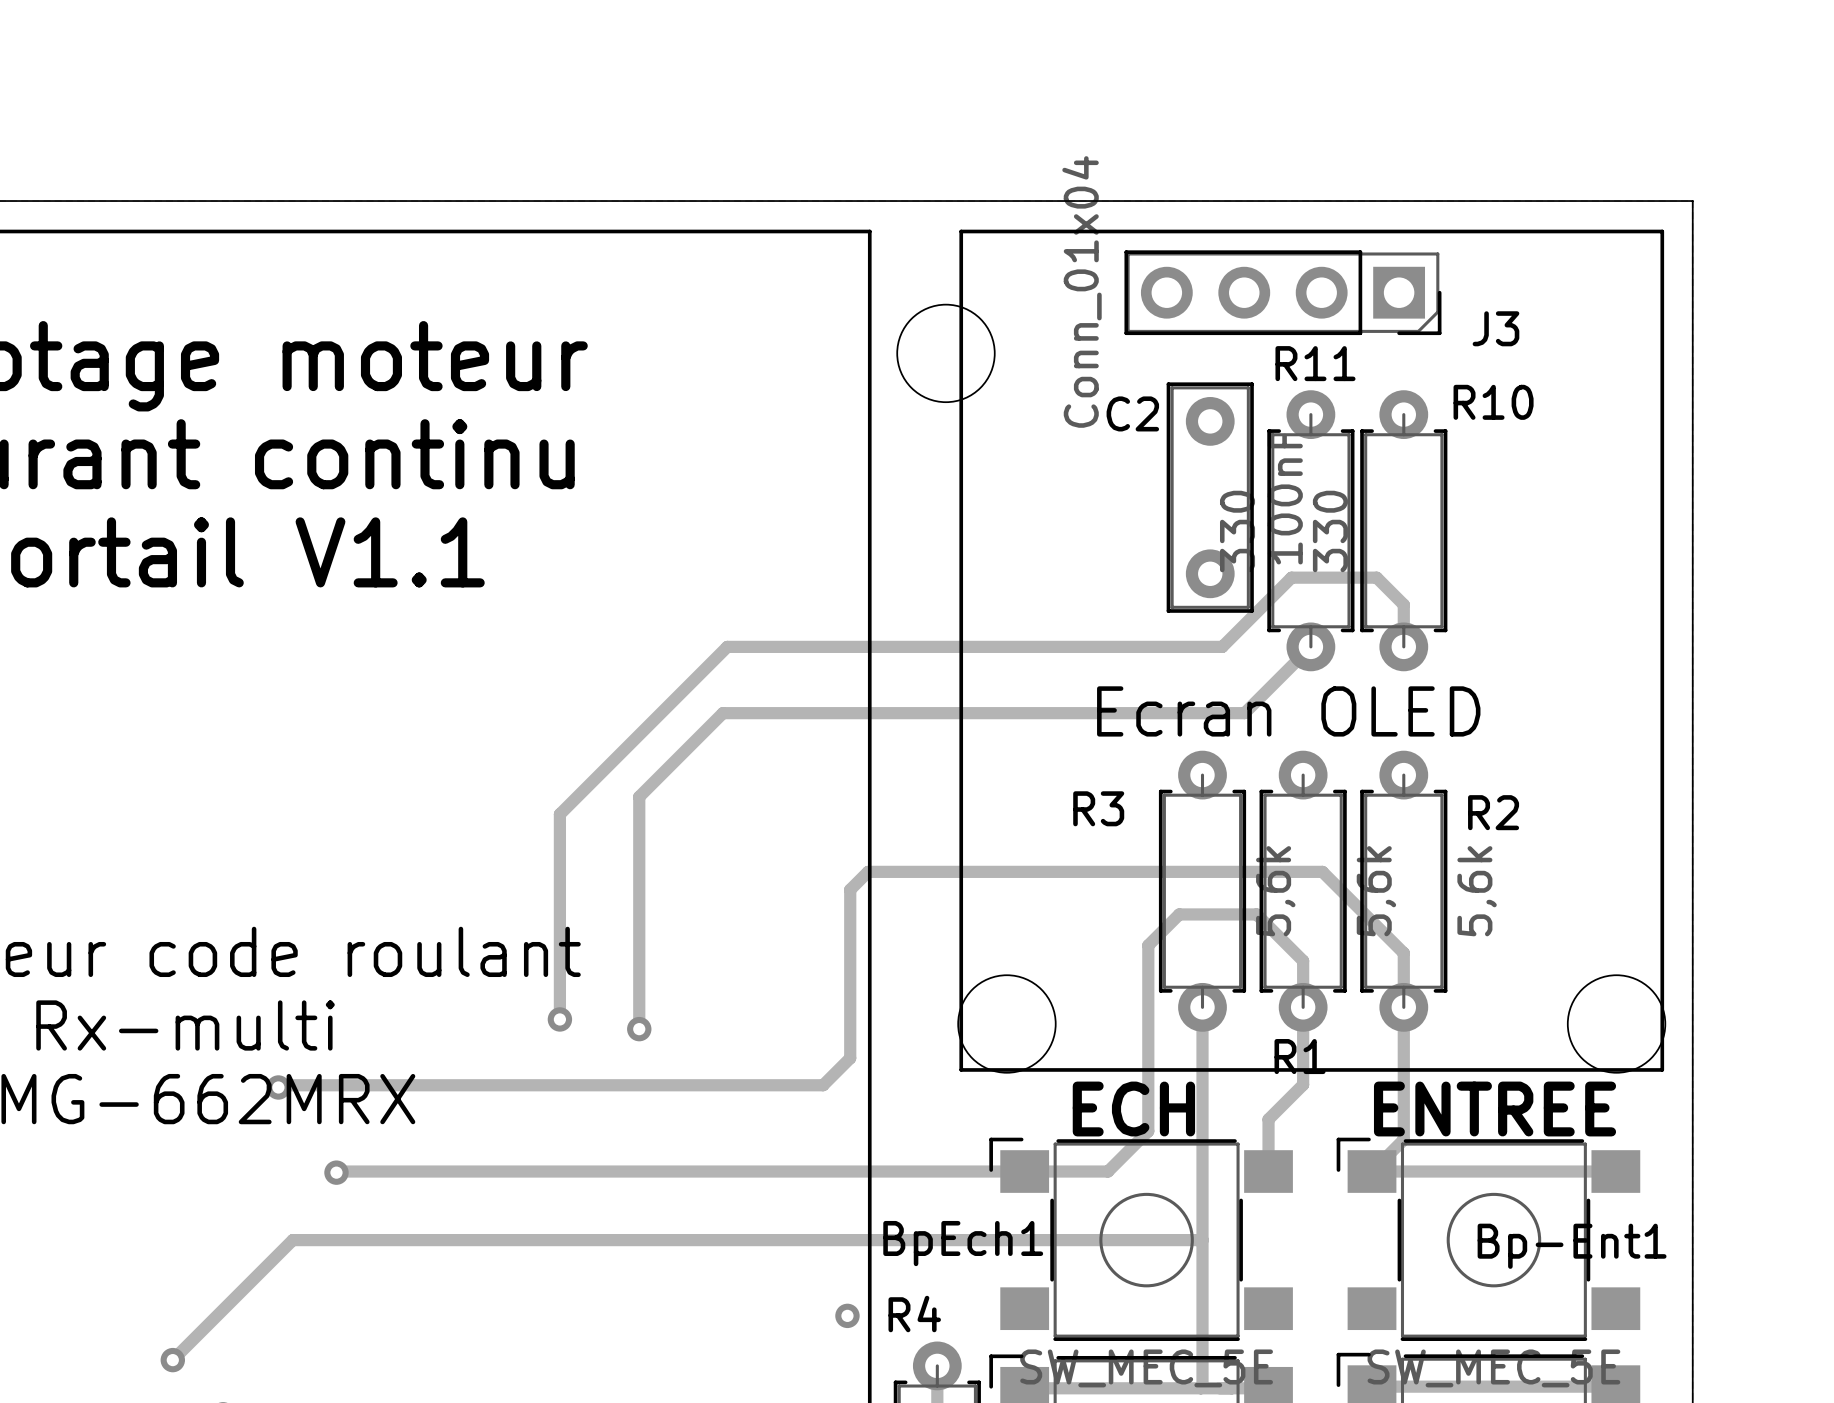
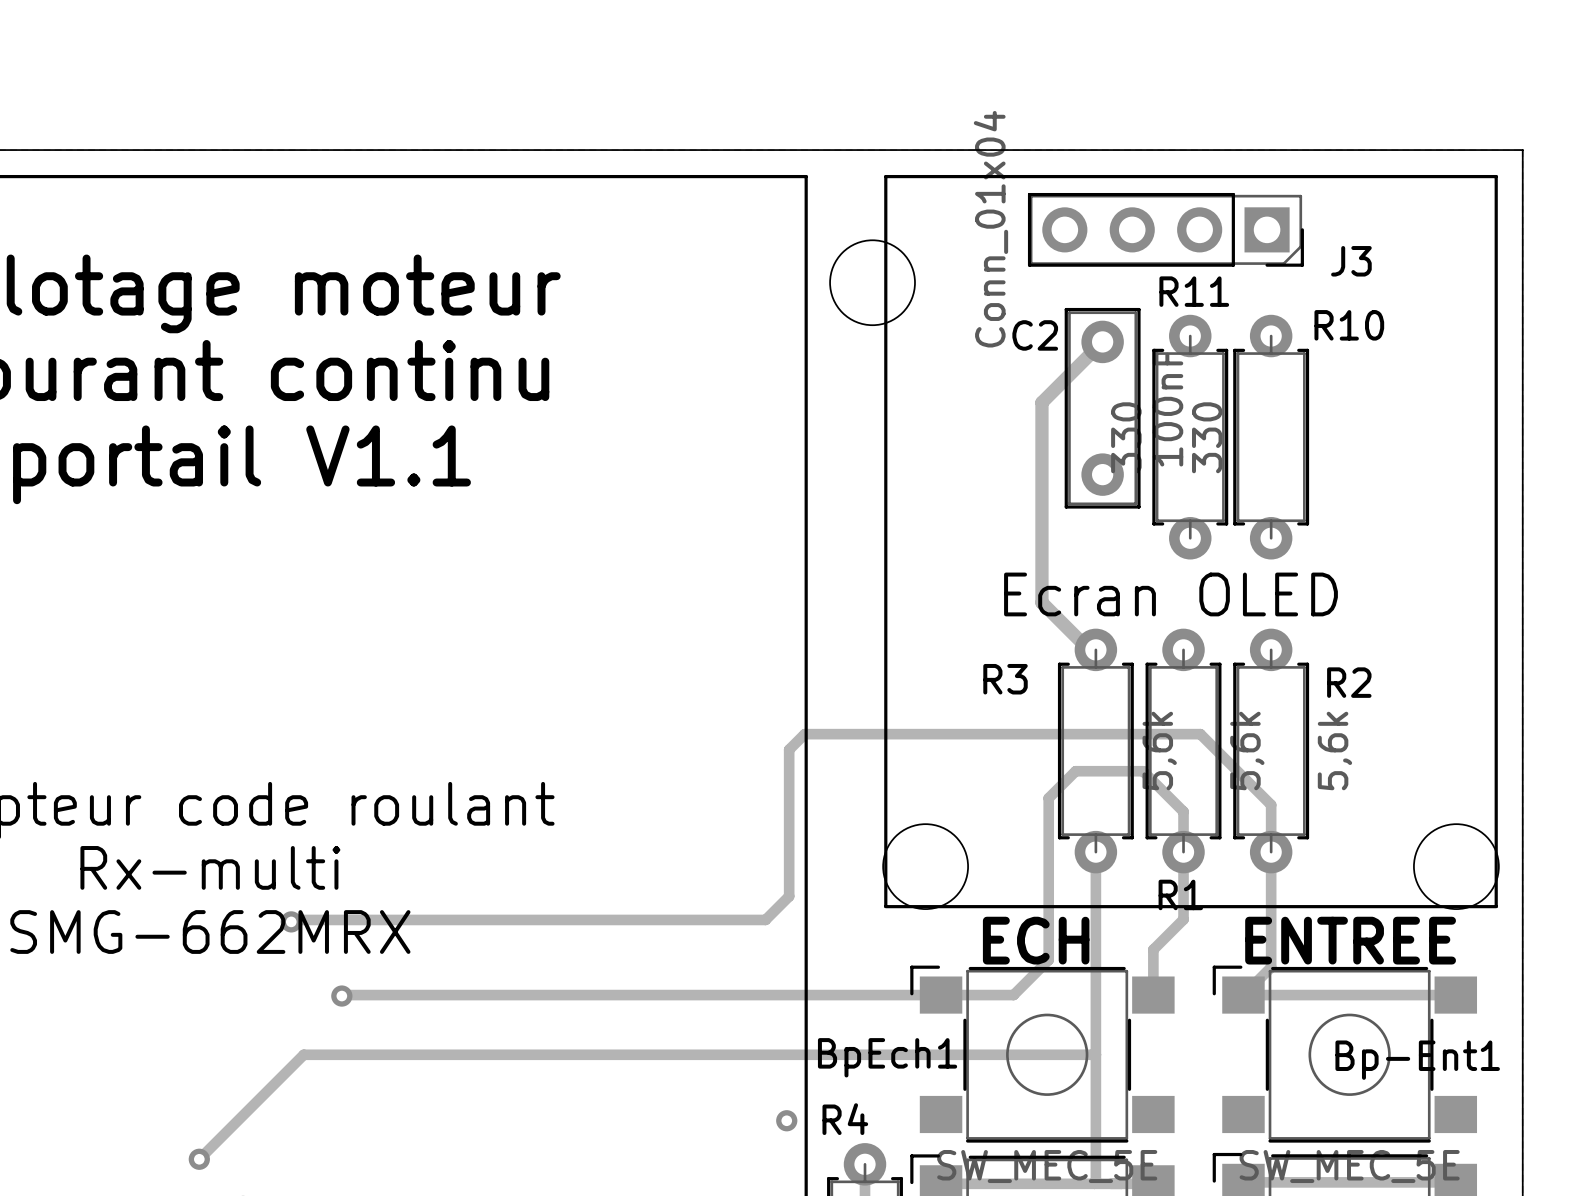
track: none -> (1102, 341) (1041, 402) (1041, 602) (1089, 649)
track: (1310, 646) (1244, 713) (722, 713) (639, 796) (639, 1029) (637, 1031) -> none
track: (1403, 646) (1403, 604) (1376, 577) (1291, 577) (1222, 646) (727, 646) (559, 814) (559, 1019) -> none
via: (559, 1019) -> none
via: (639, 1029) -> none

